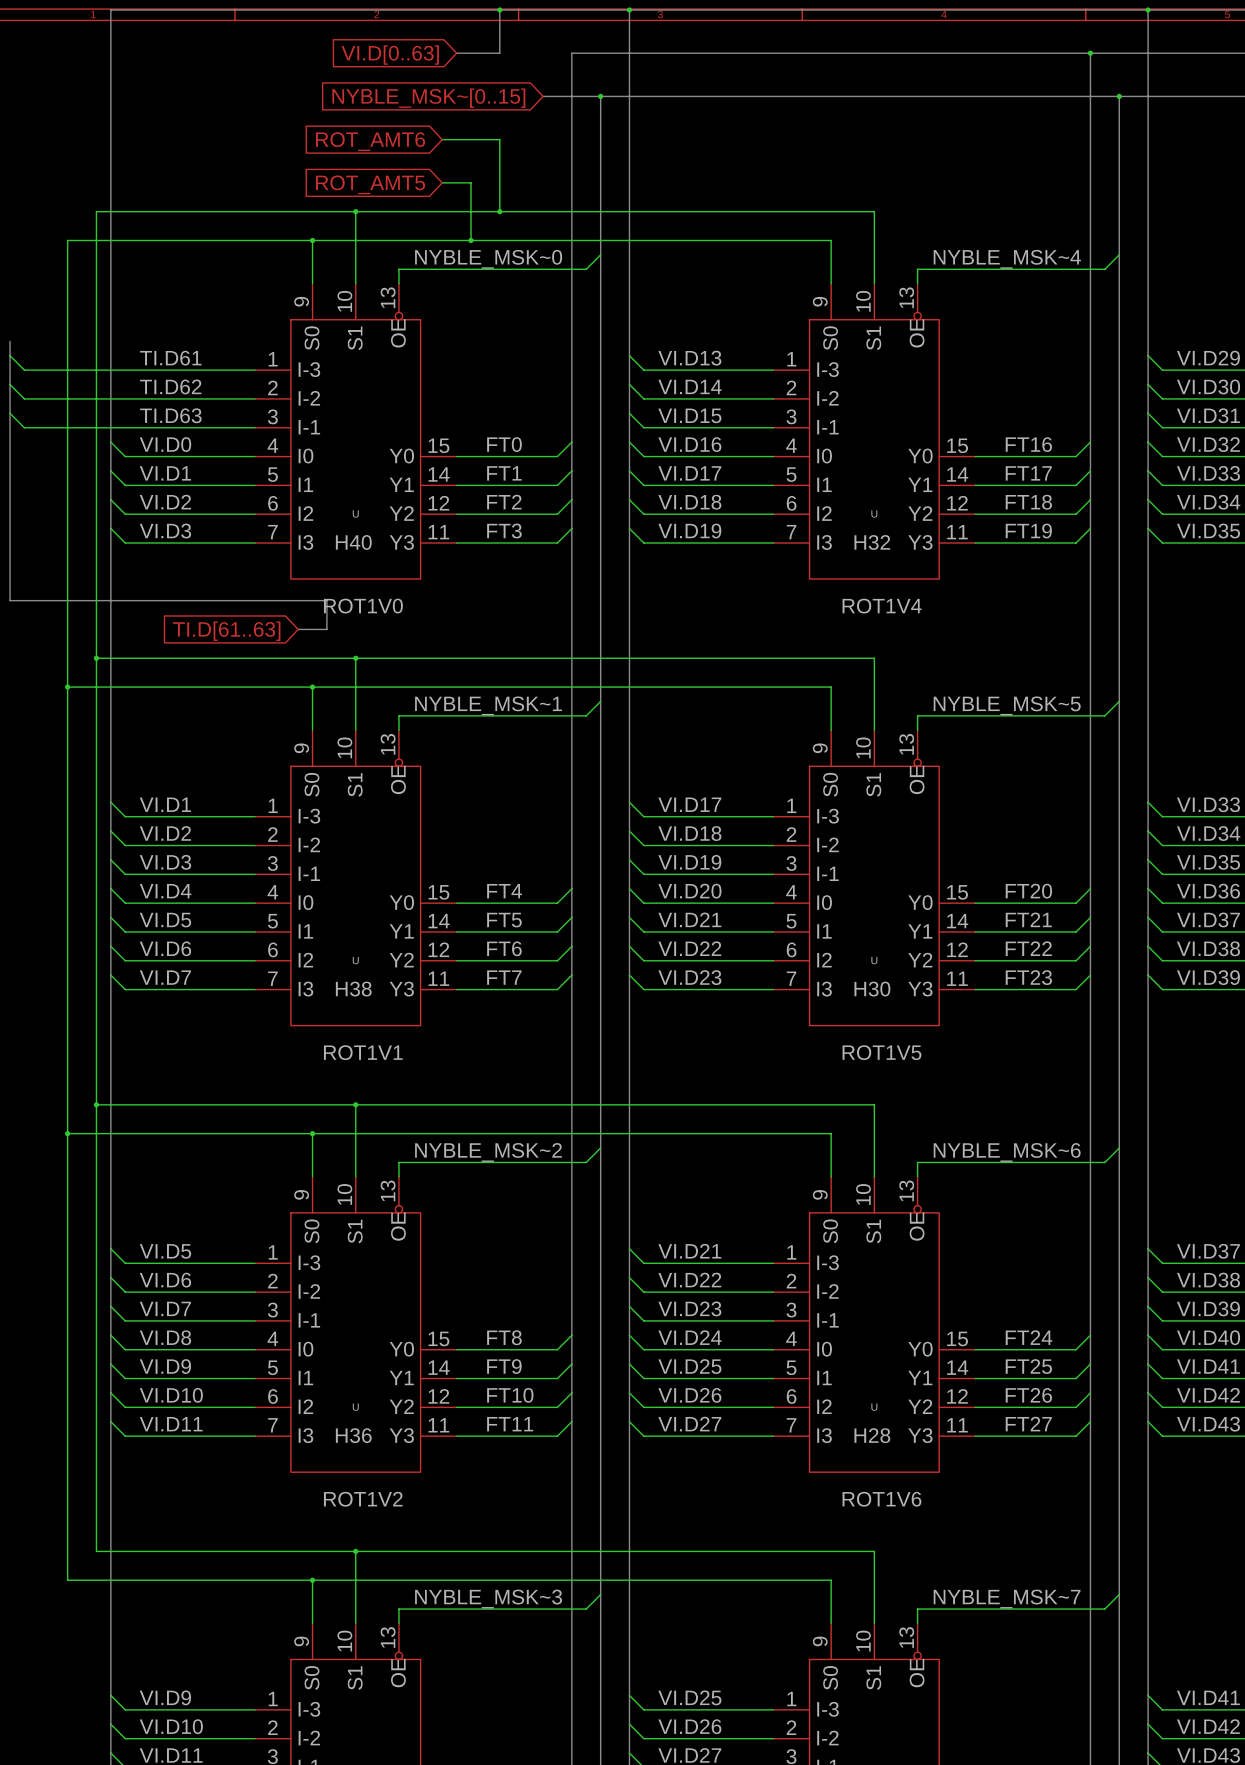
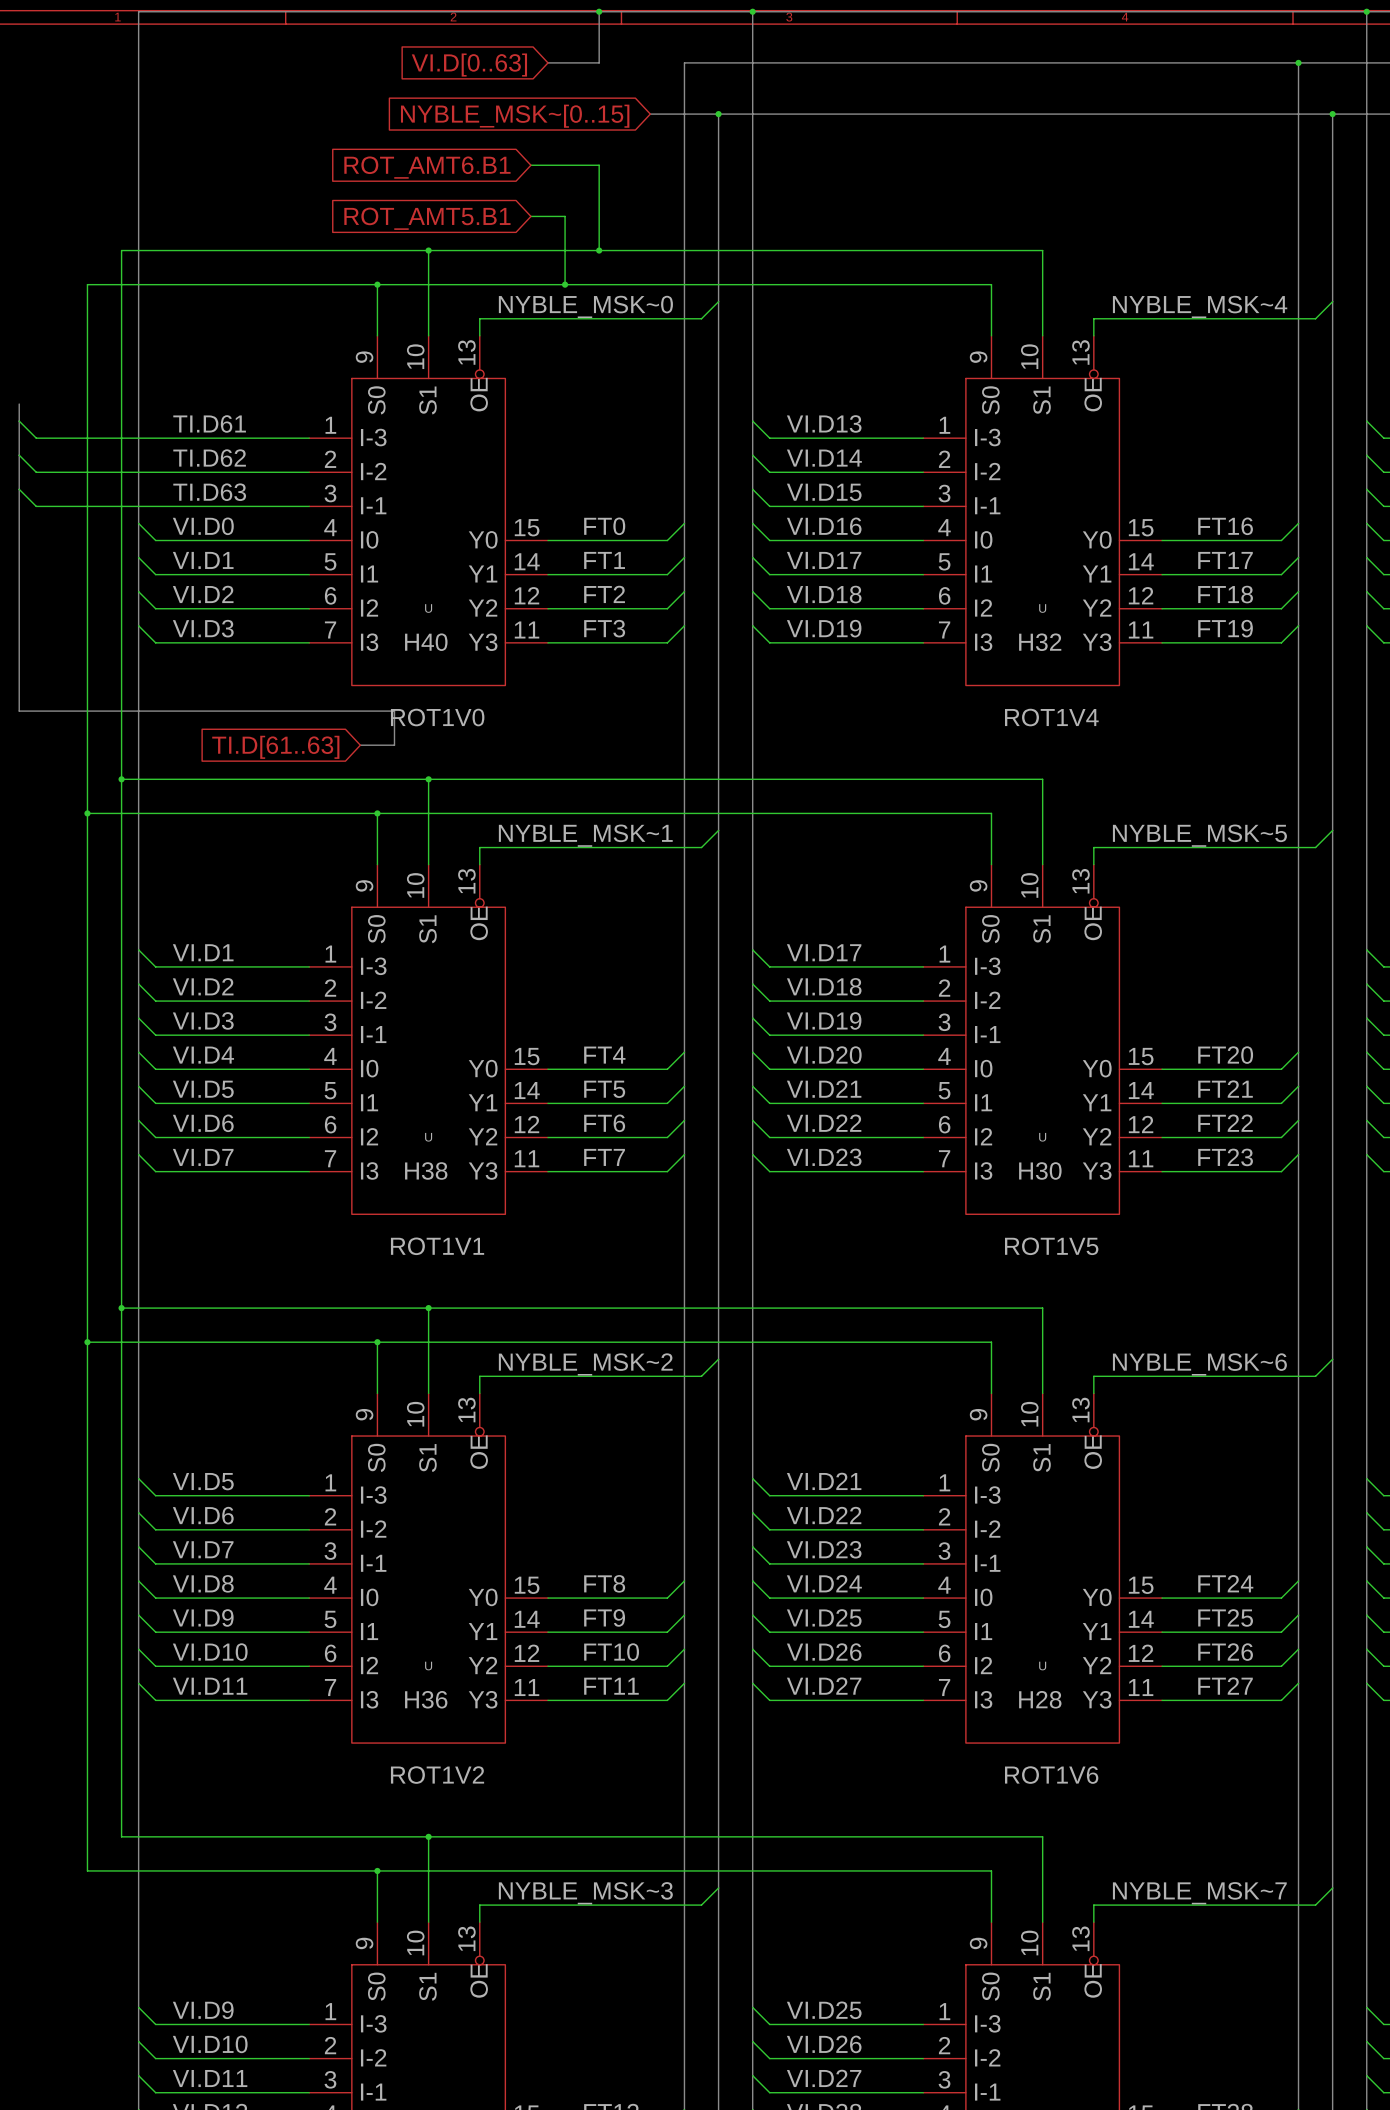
global label: ROT_AMT6 (370, 141) -> ROT_AMT6.B1 (427, 167)
global label: ROT_AMT5 (370, 184) -> ROT_AMT5.B1 (427, 218)

